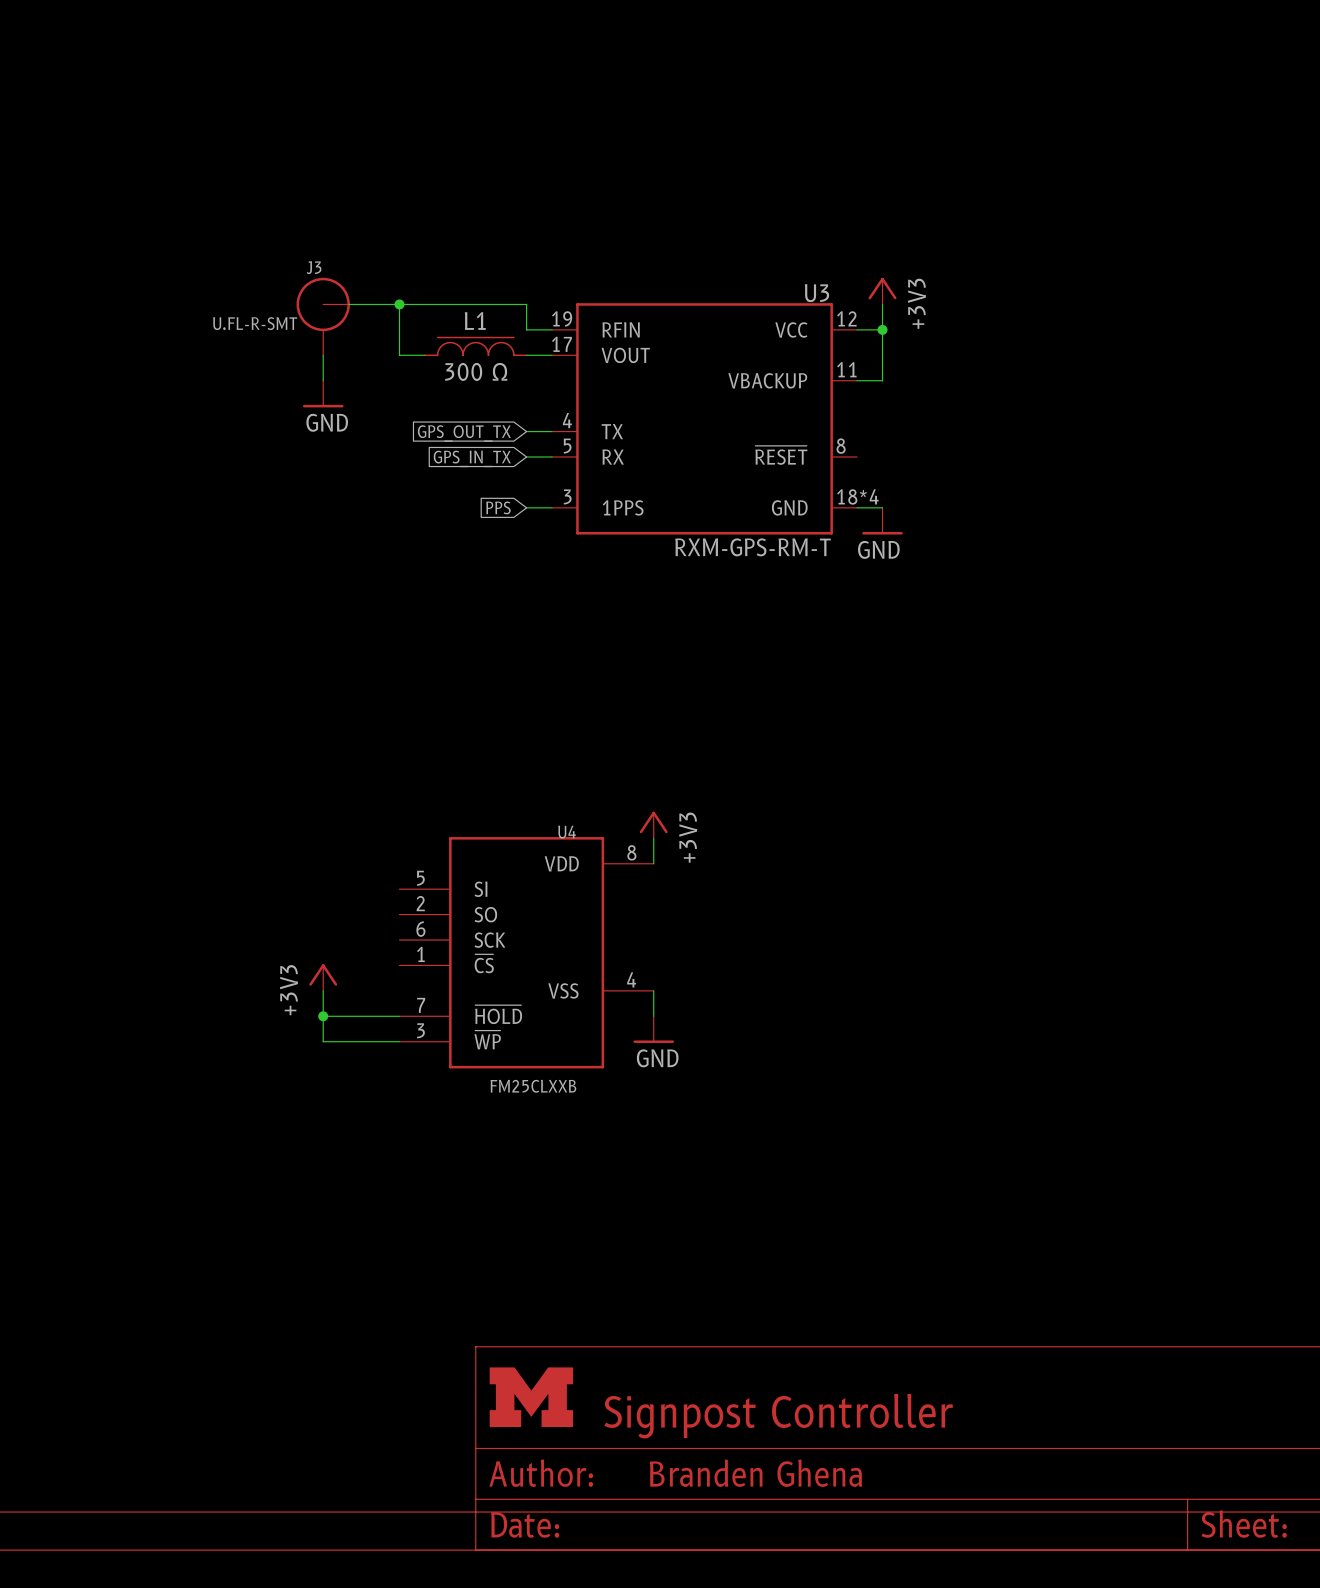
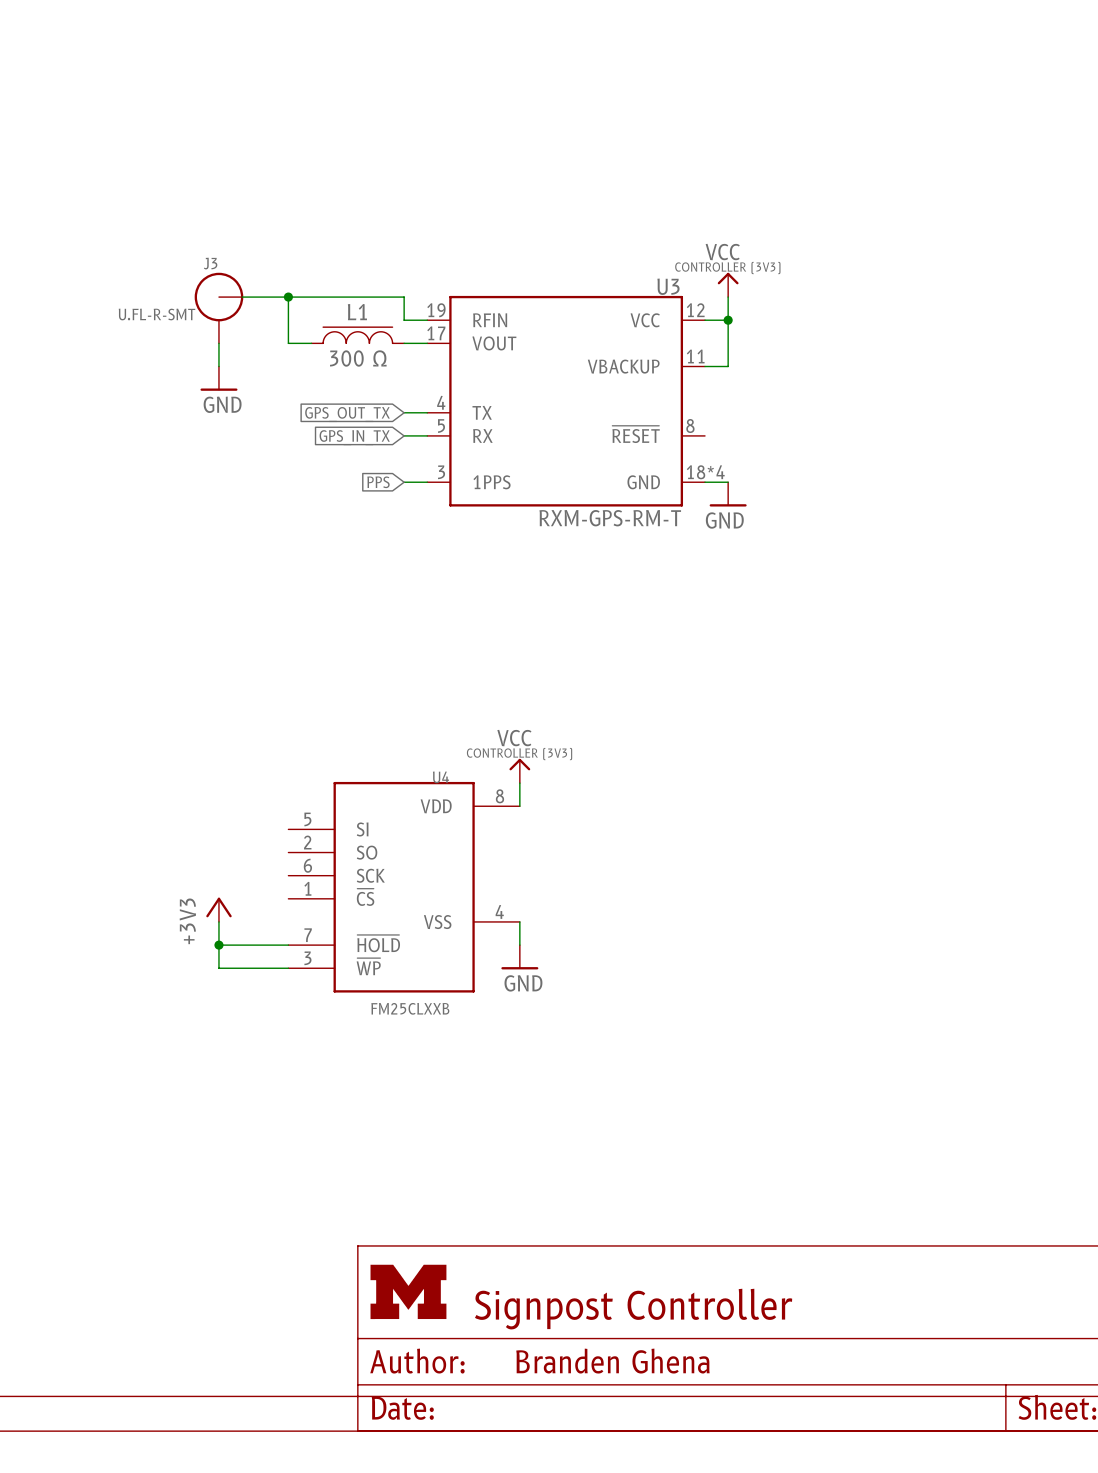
power symbol shape: [868, 277, 897, 305] -> [717, 272, 739, 298]
power symbol text: +3V3 (916, 303) -> none
power symbol shape: [639, 811, 668, 839] -> [509, 758, 531, 784]
power symbol text: +3V3 (688, 837) -> none

